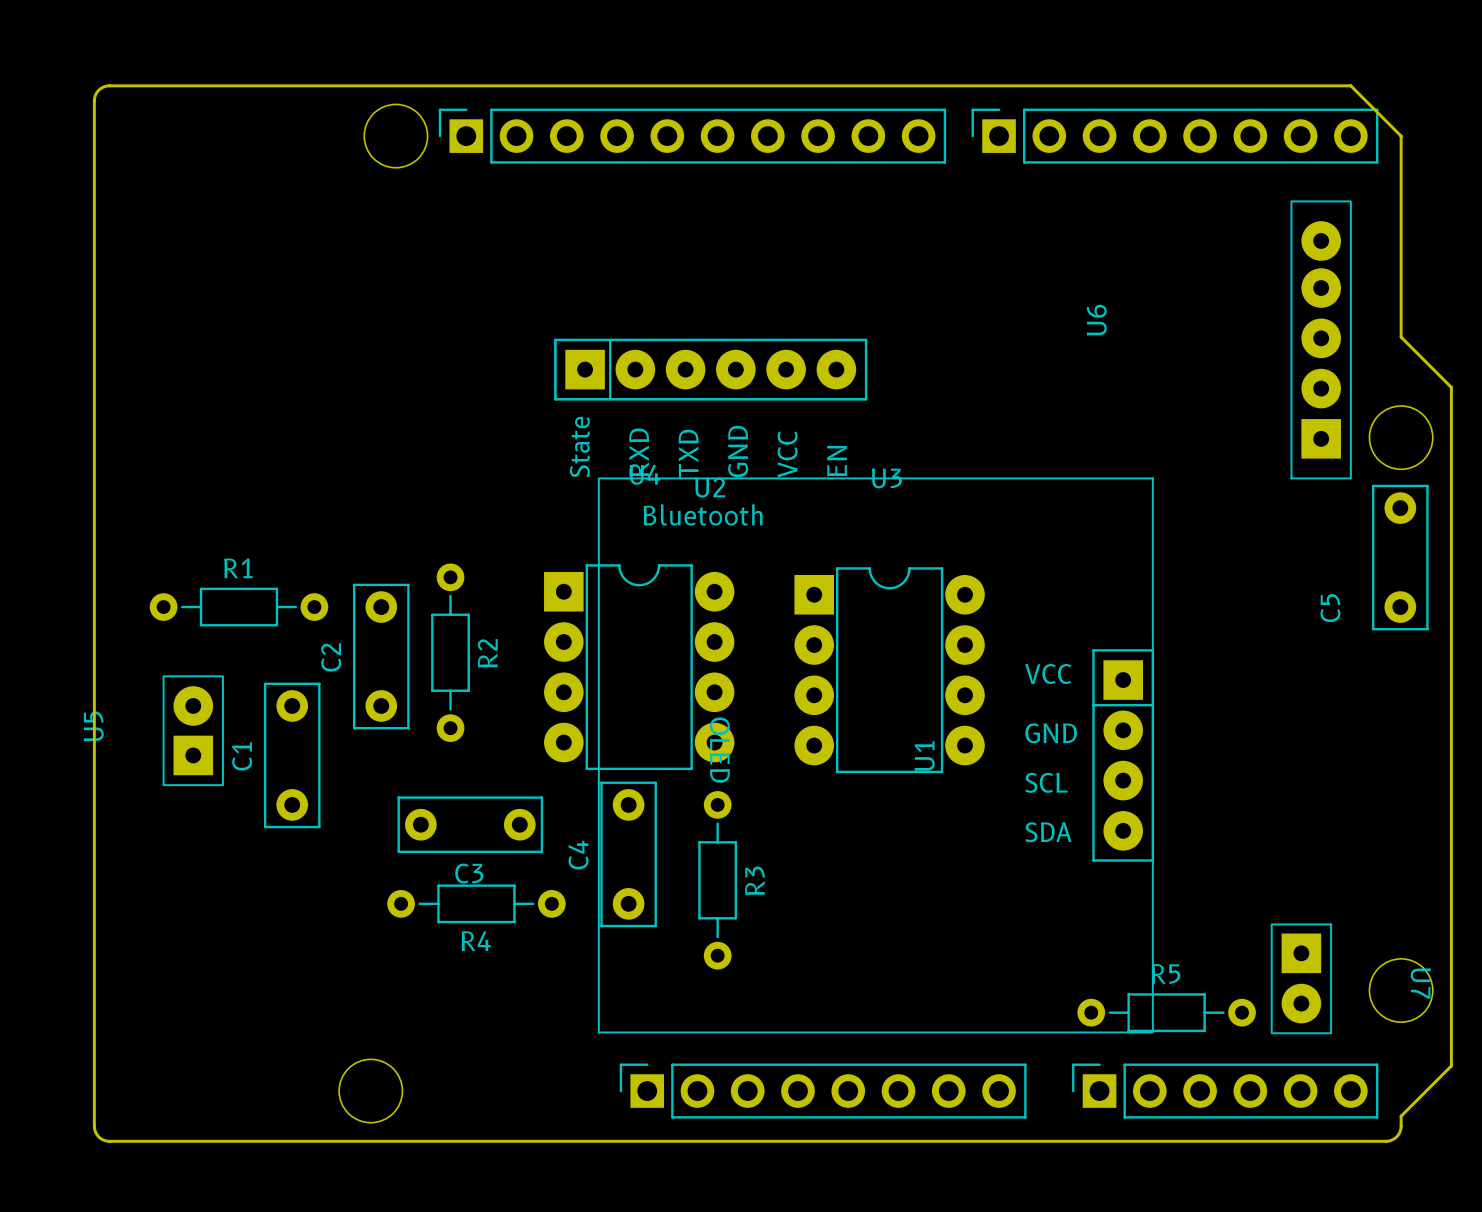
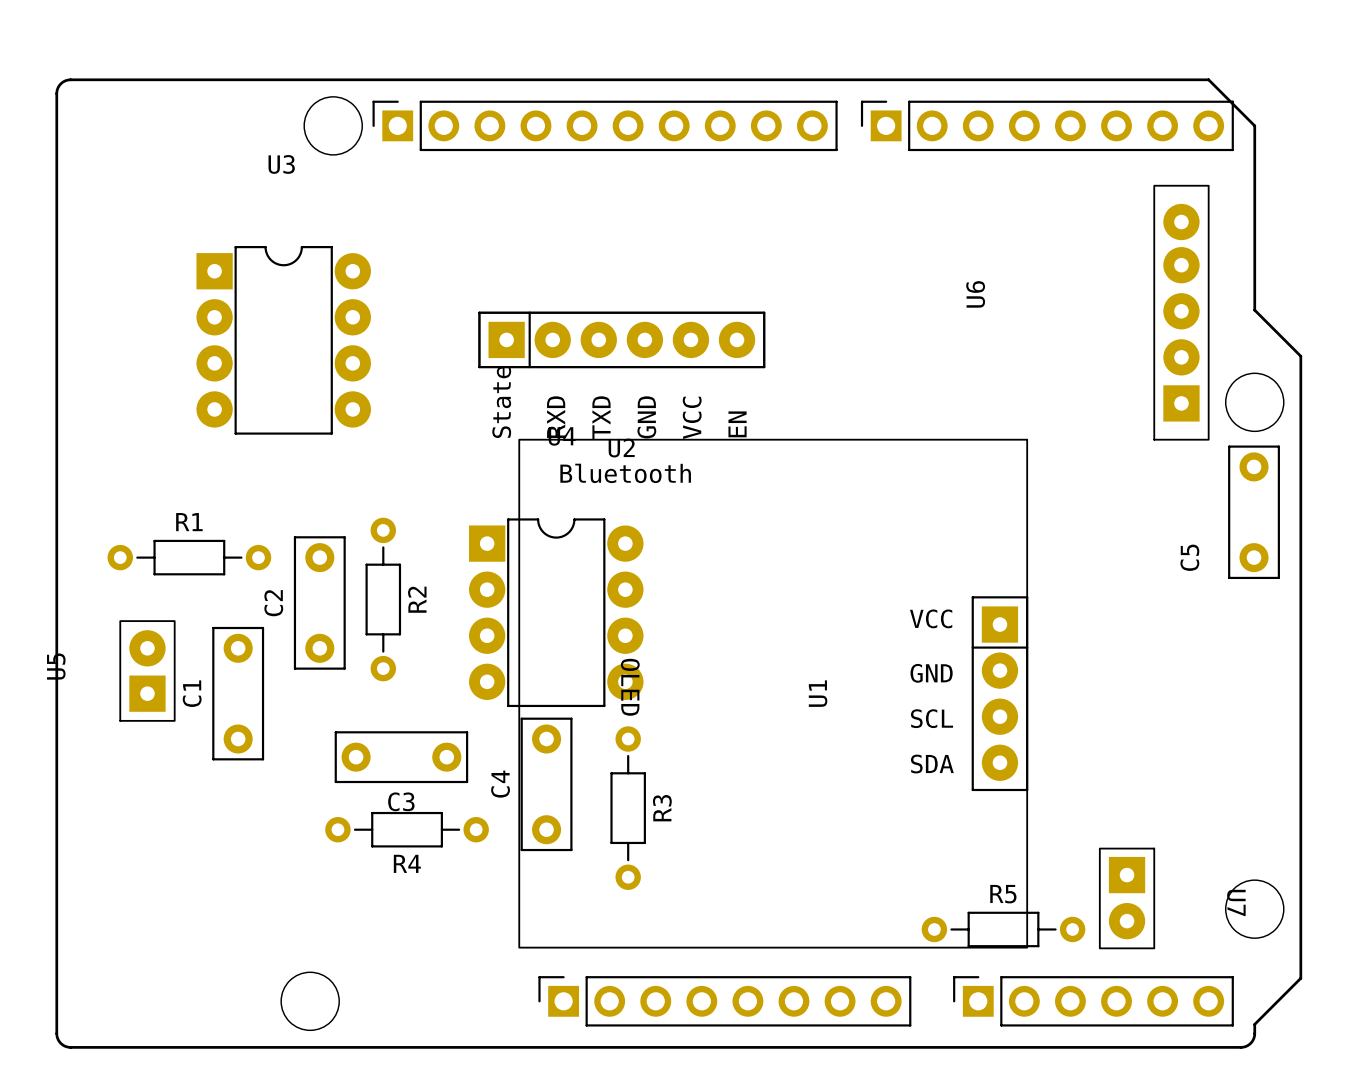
U3 position: (889, 670) -> (283, 340)
U7 position: (1301, 978) -> (1127, 898)
R5 position: (1166, 1012) -> (1003, 929)

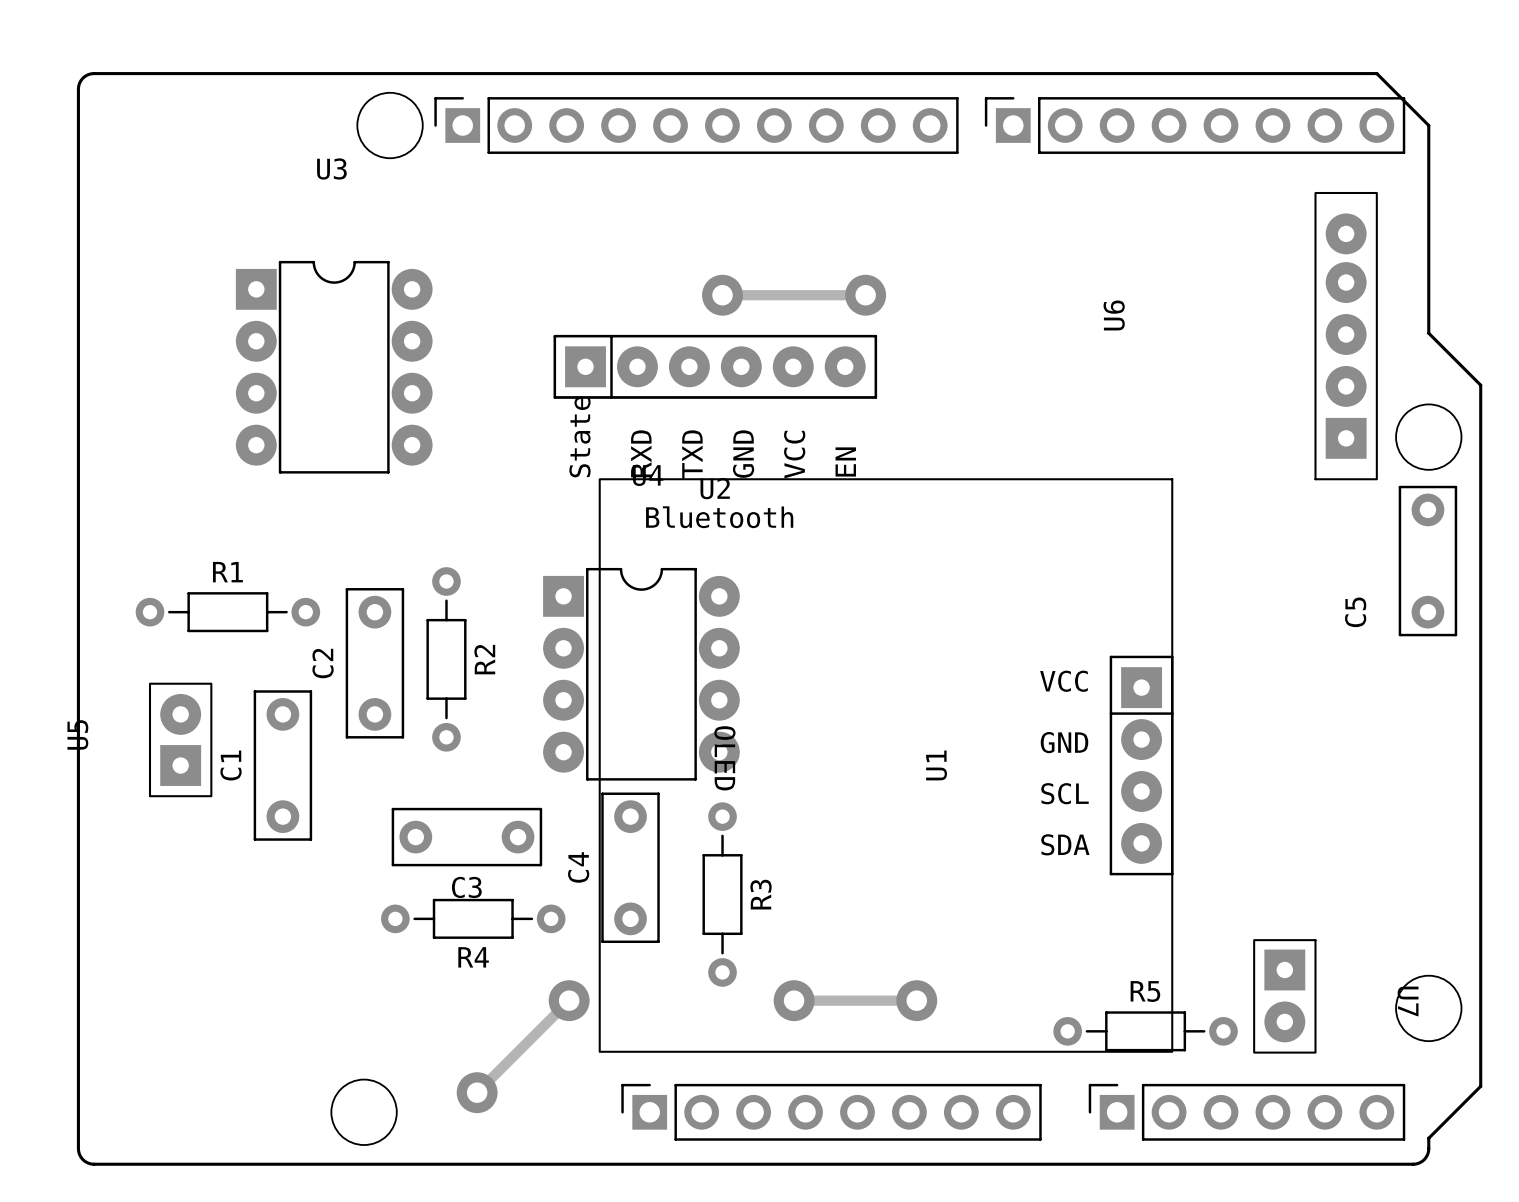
track: none -> (722, 295) (865, 295)
via: none -> (722, 295)
via: none -> (865, 295)
track: none -> (569, 1000) (477, 1092)
via: none -> (569, 1000)
track: none -> (794, 1000) (916, 1000)
via: none -> (794, 1000)
via: none -> (916, 1000)
via: none -> (477, 1092)

